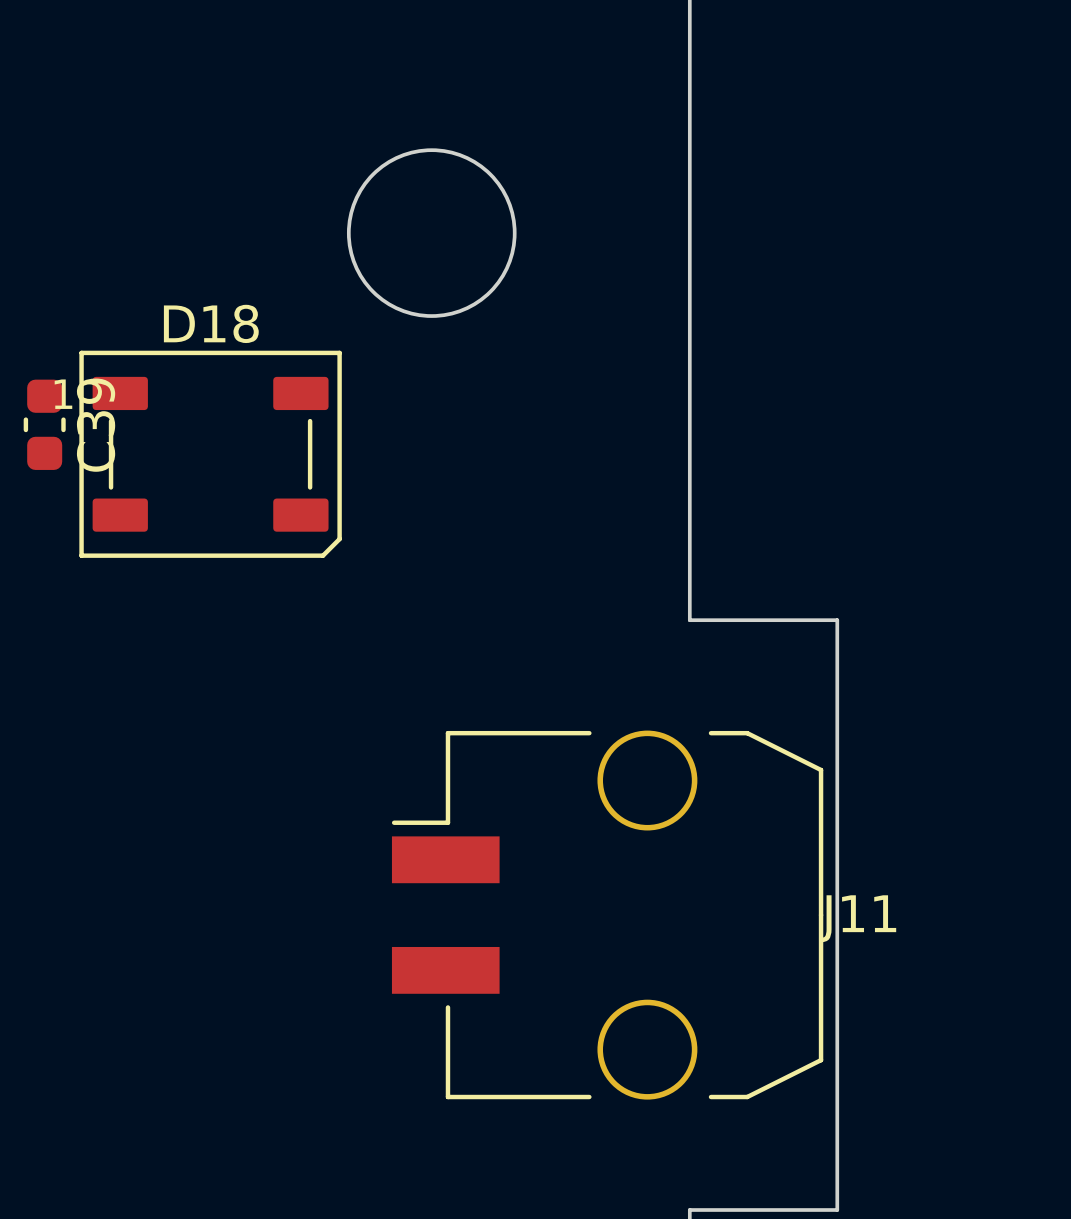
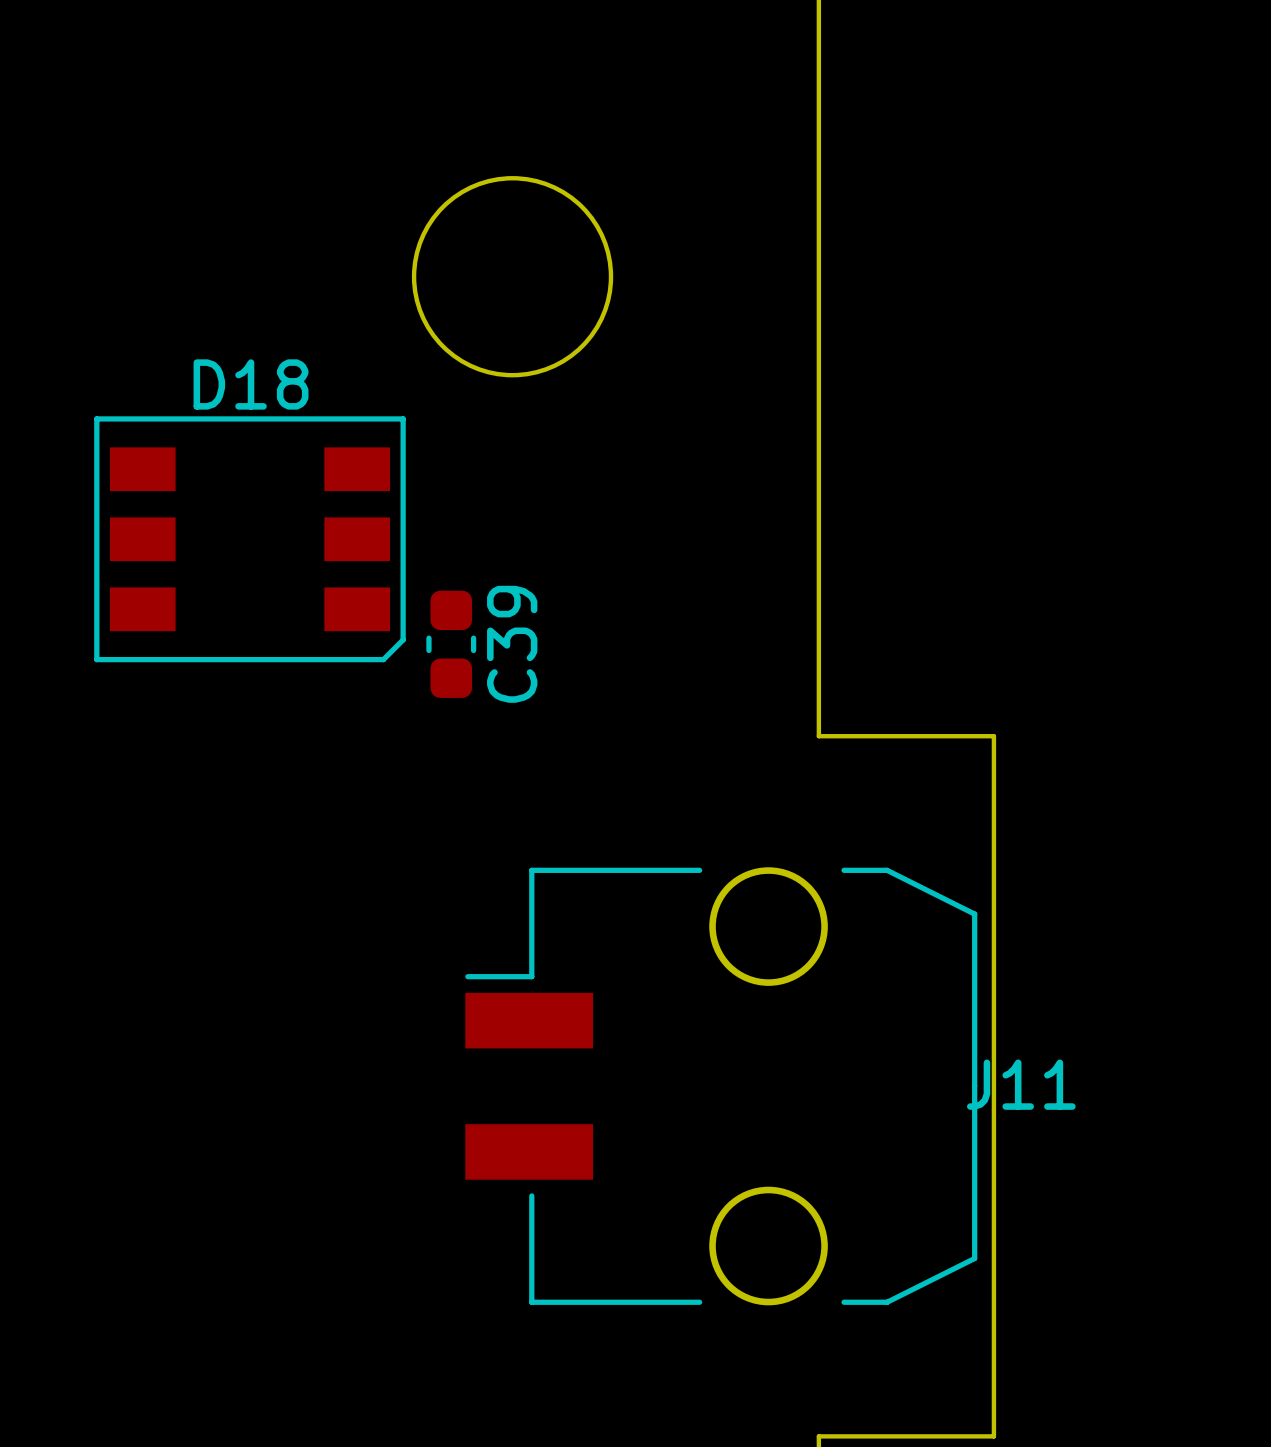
D18 footprint: [79, 350, 342, 558] -> [94, 416, 406, 663]
C39 position: (44, 424) -> (451, 644)

